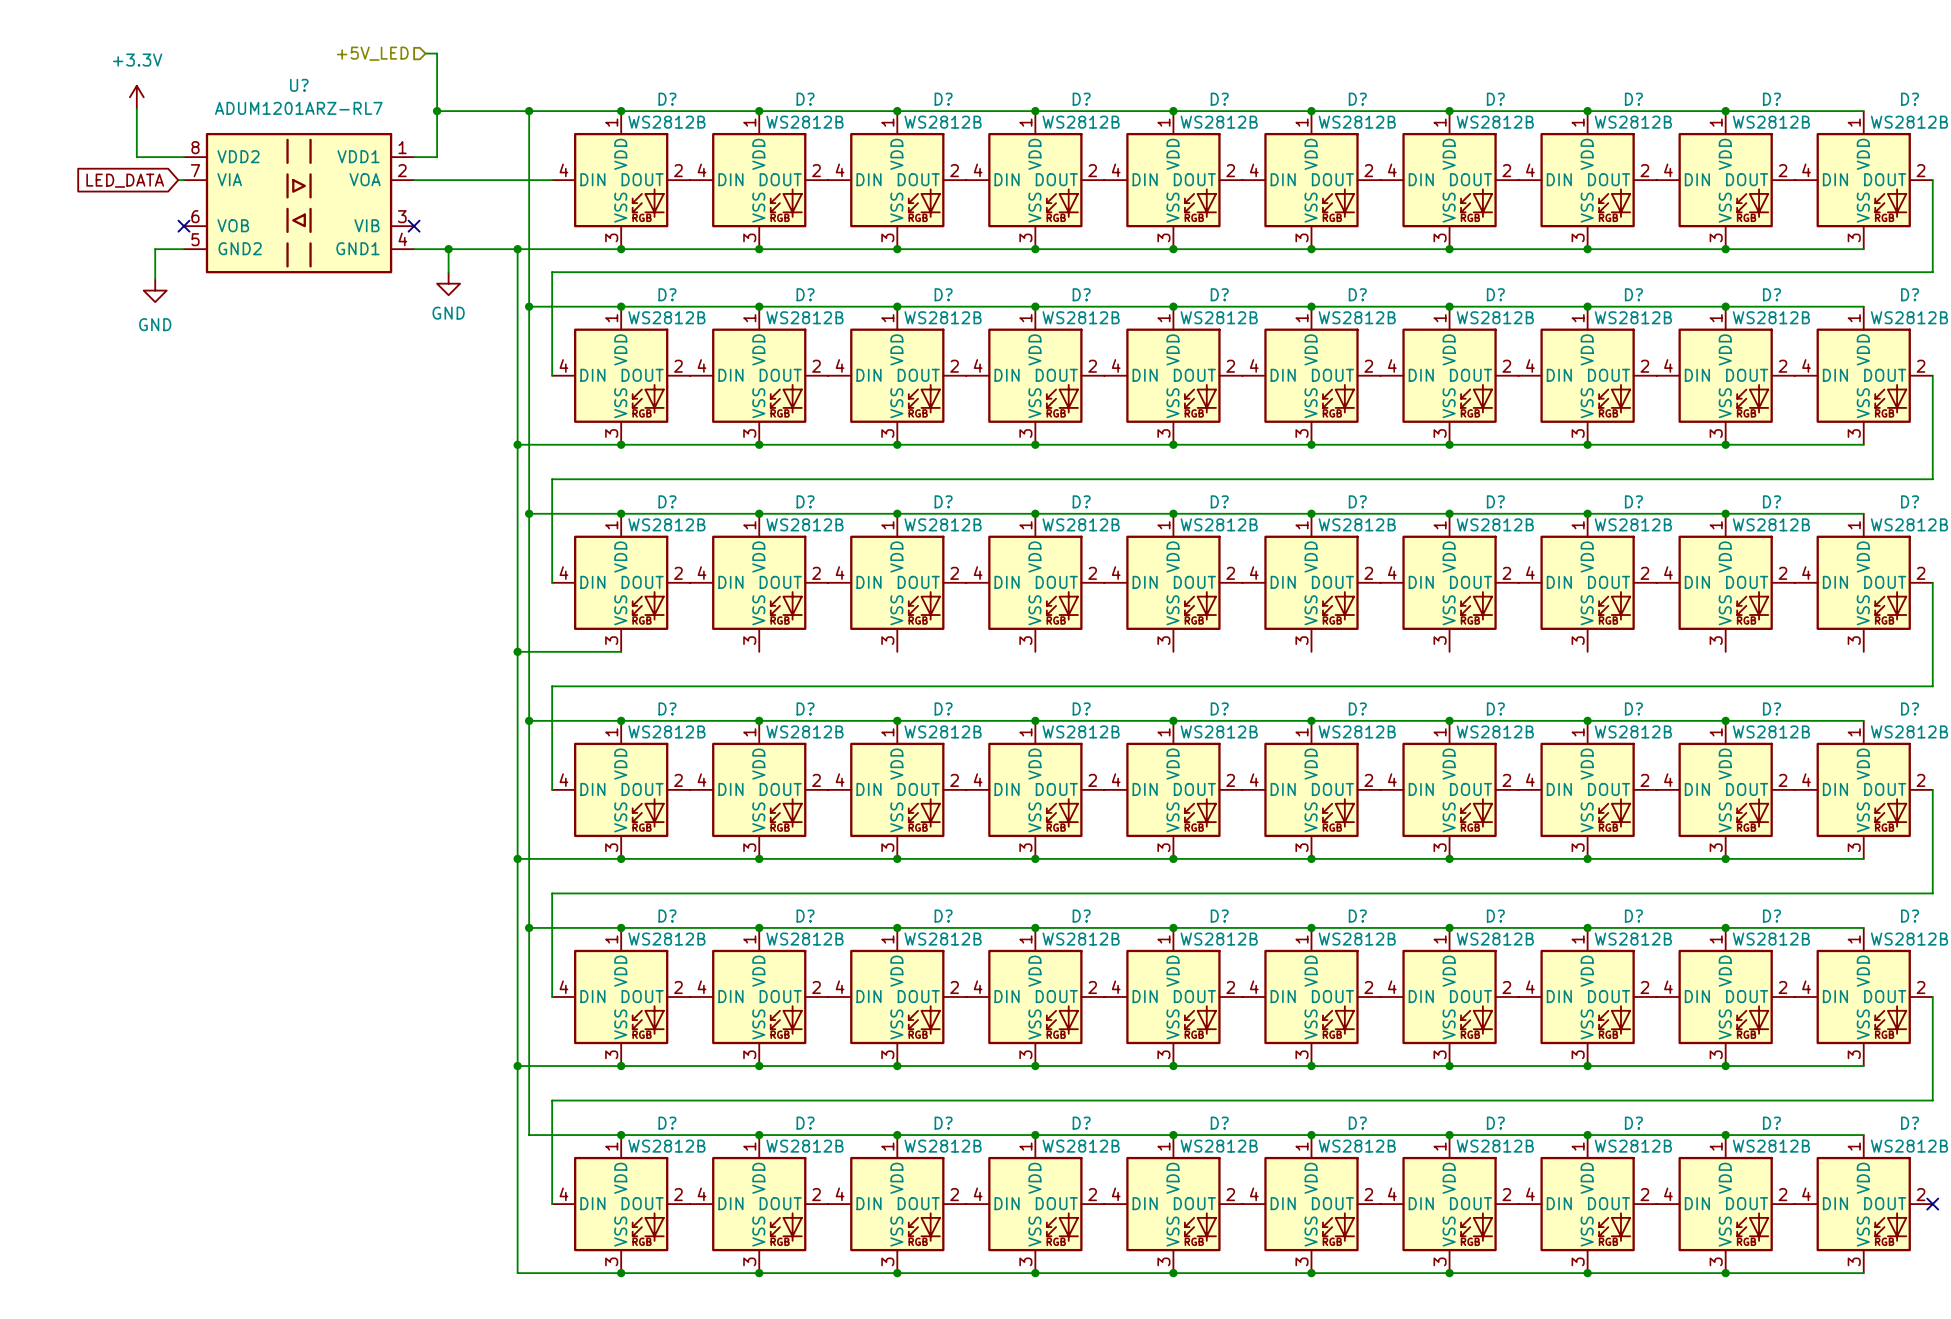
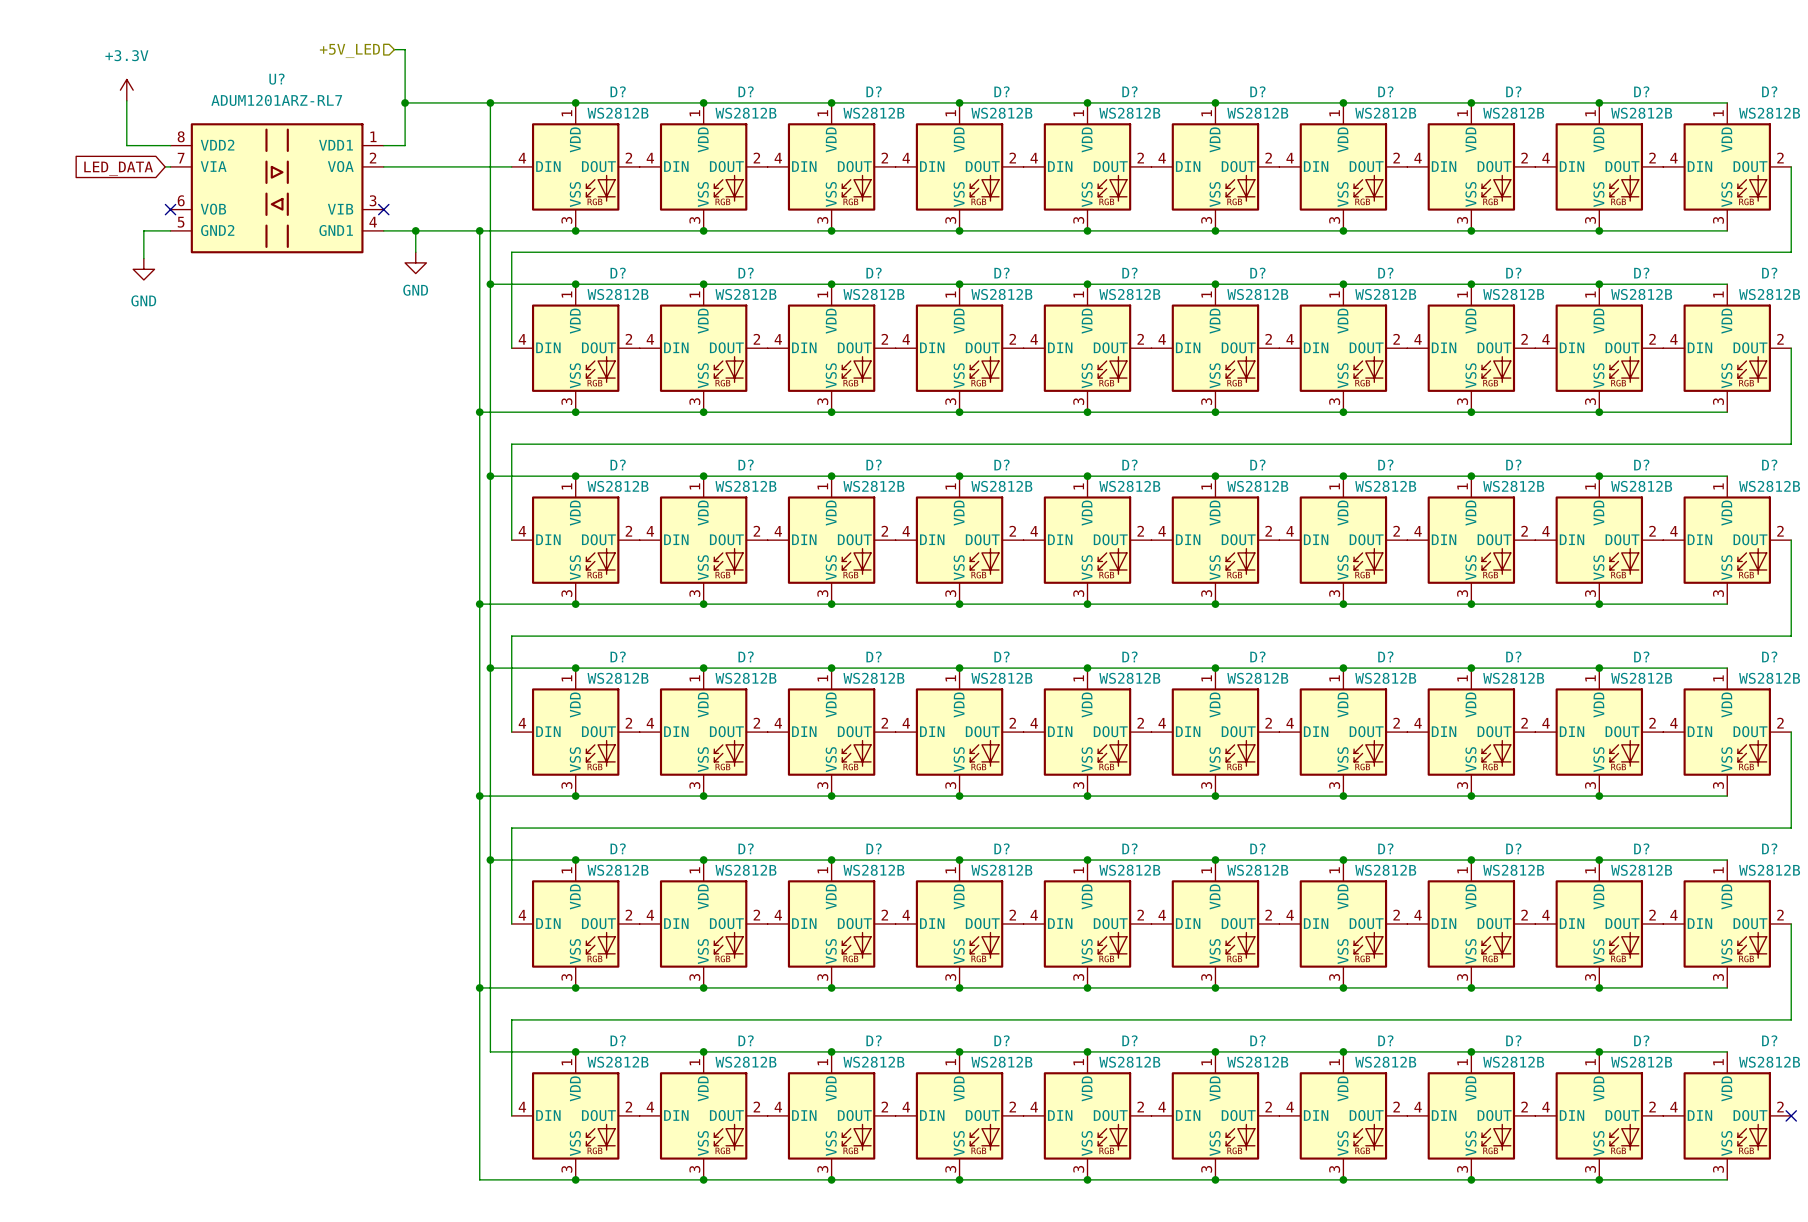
wire: none -> (575, 604) (1727, 604)
junction: none -> (575, 604)
junction: none -> (703, 604)
junction: none -> (831, 604)
junction: none -> (959, 604)
junction: none -> (1087, 604)
junction: none -> (1215, 604)
junction: none -> (1343, 604)
junction: none -> (1471, 604)
junction: none -> (1599, 604)

